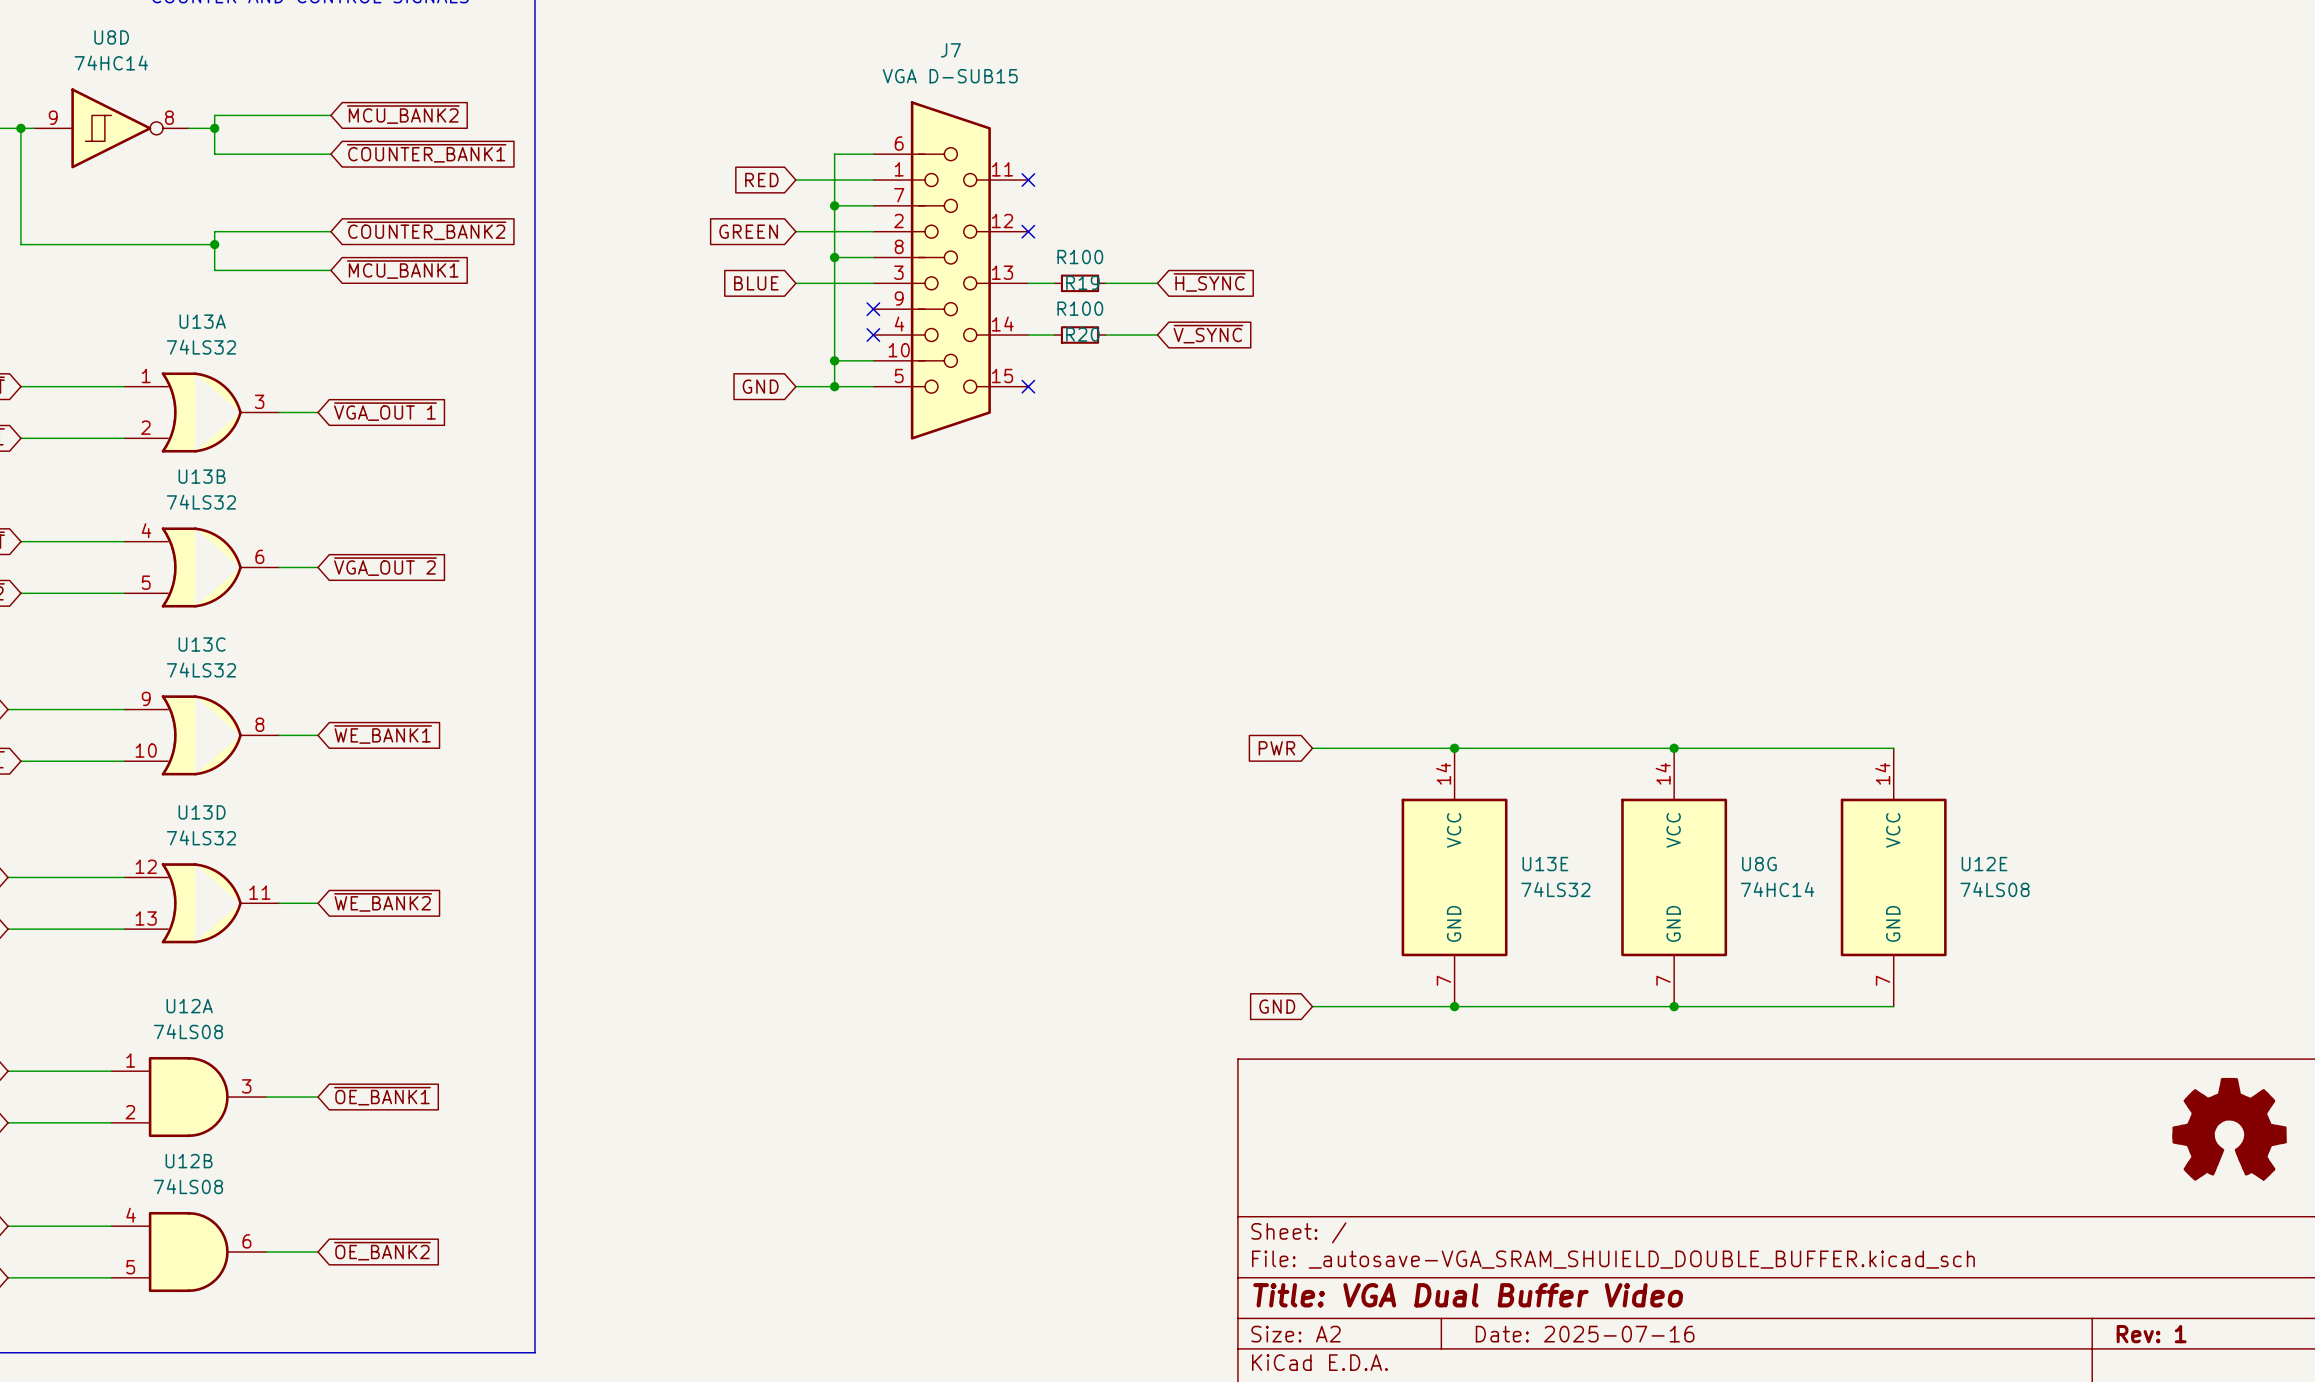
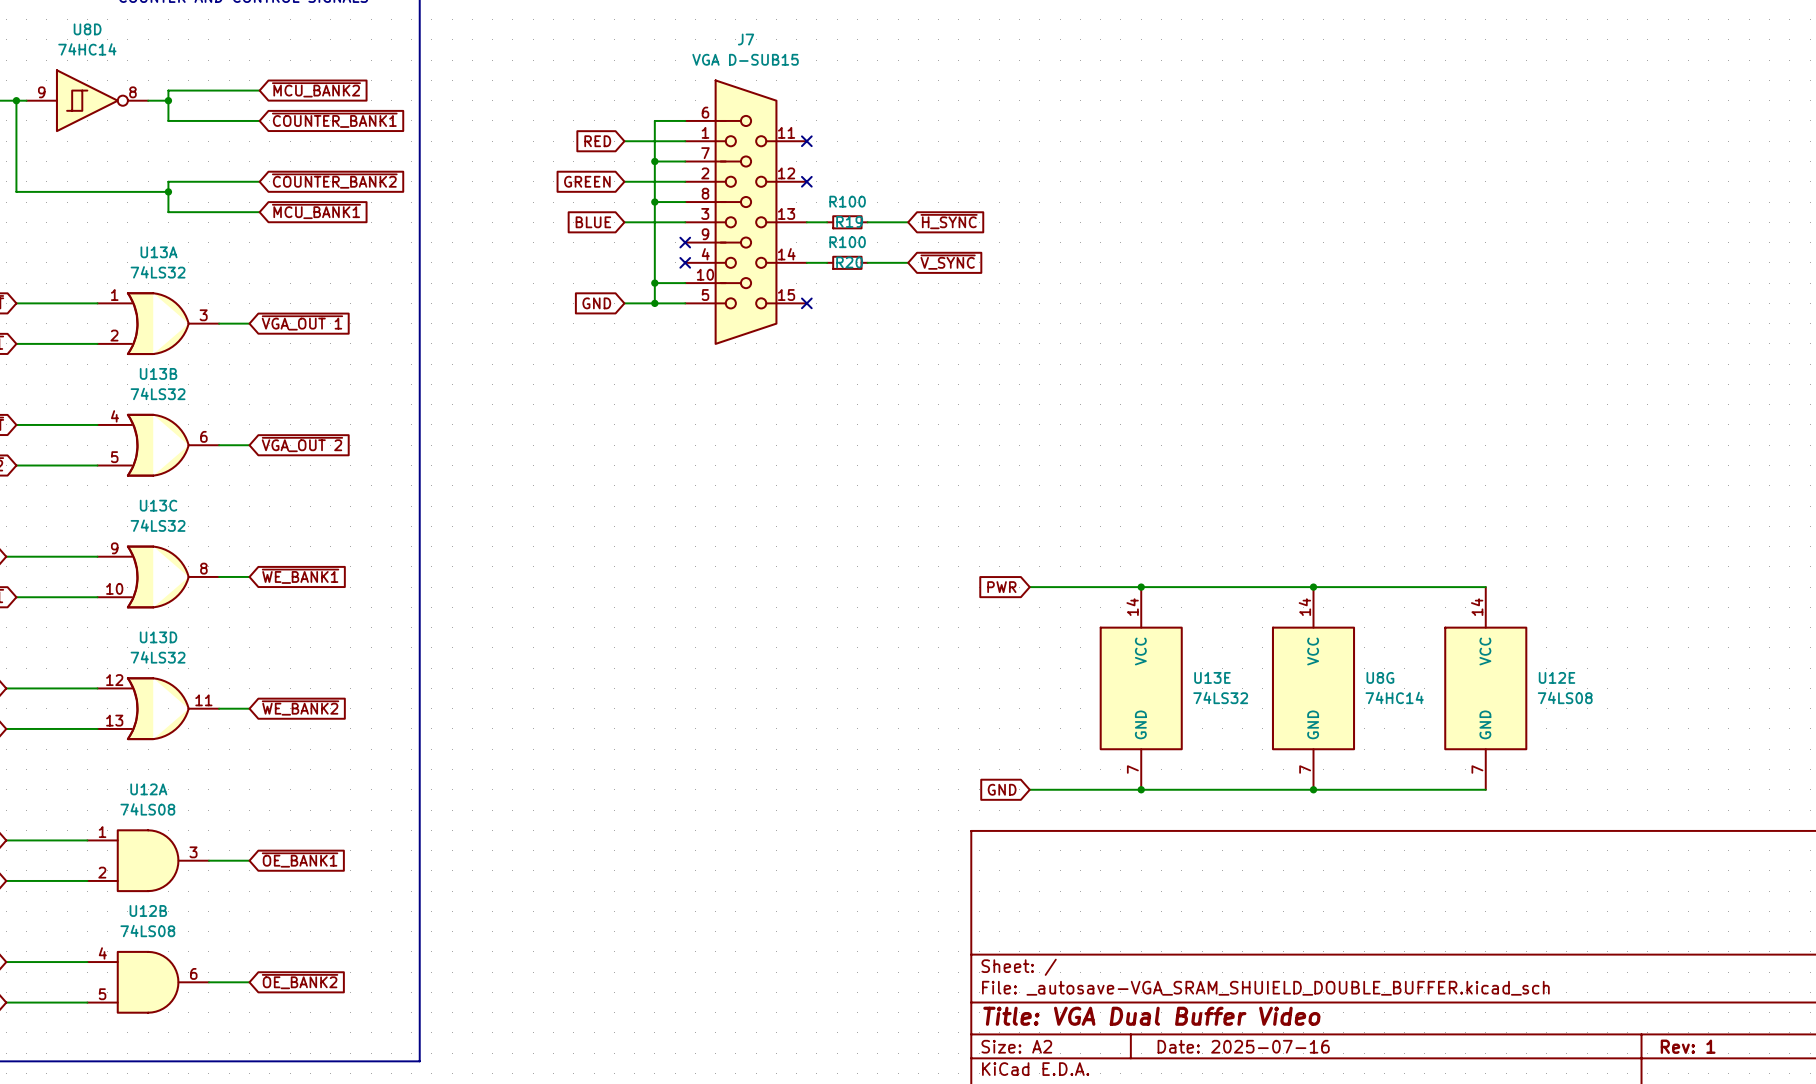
power symbol: (2229, 1129) -> none

